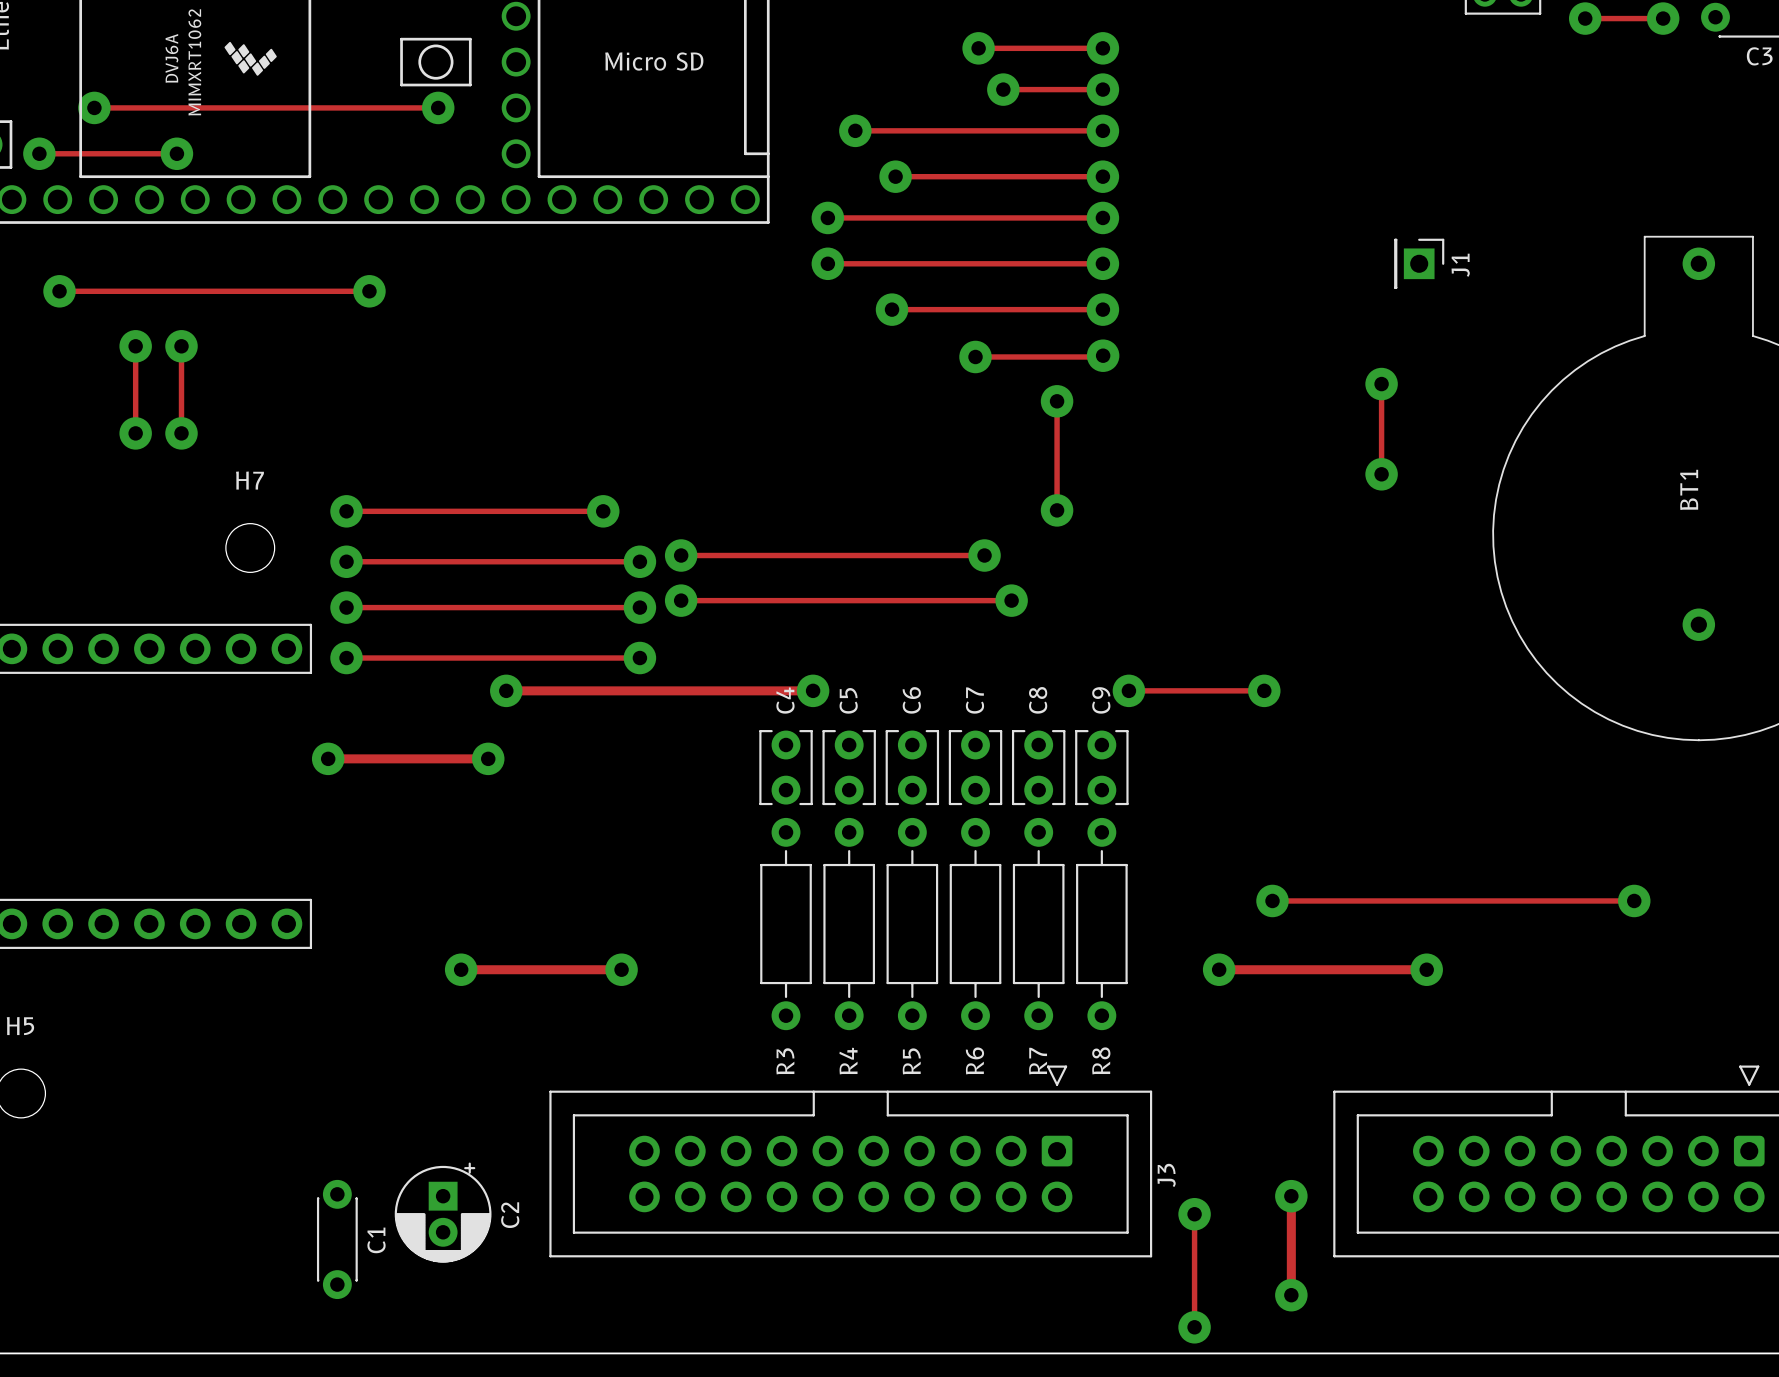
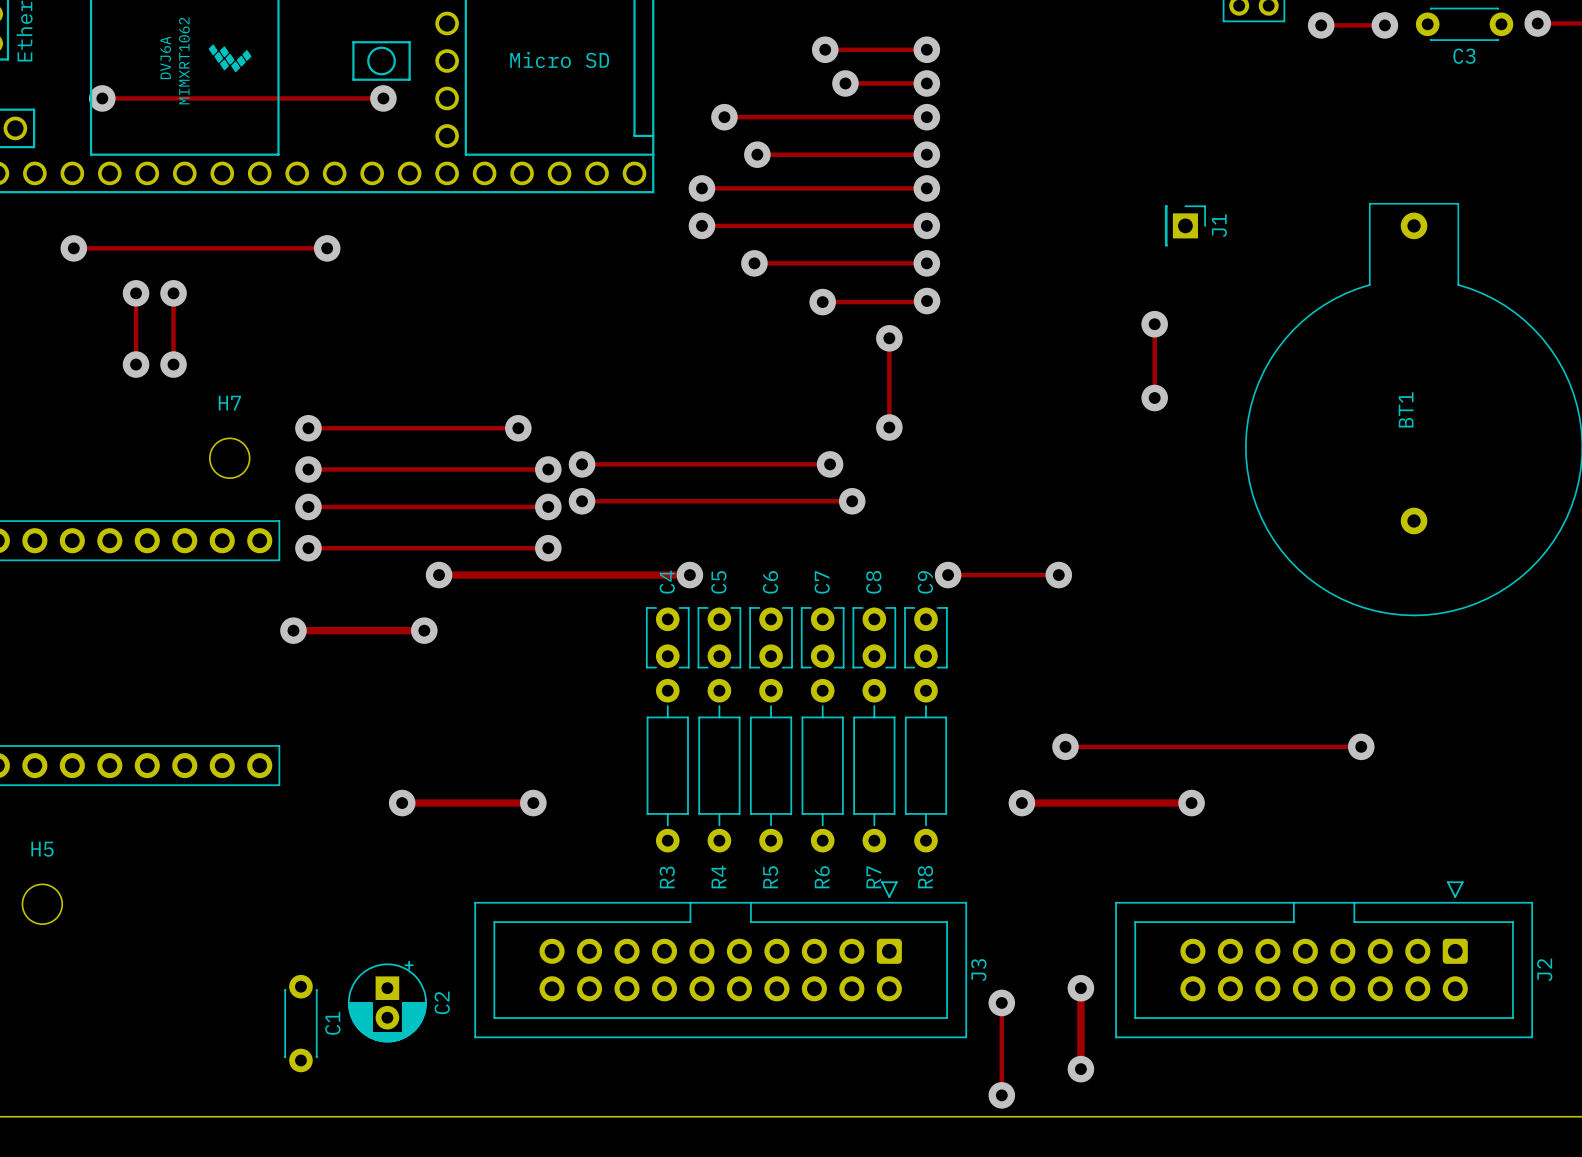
track: (39, 153) (176, 153) -> none
via: (39, 153) -> none
via: (176, 153) -> none

